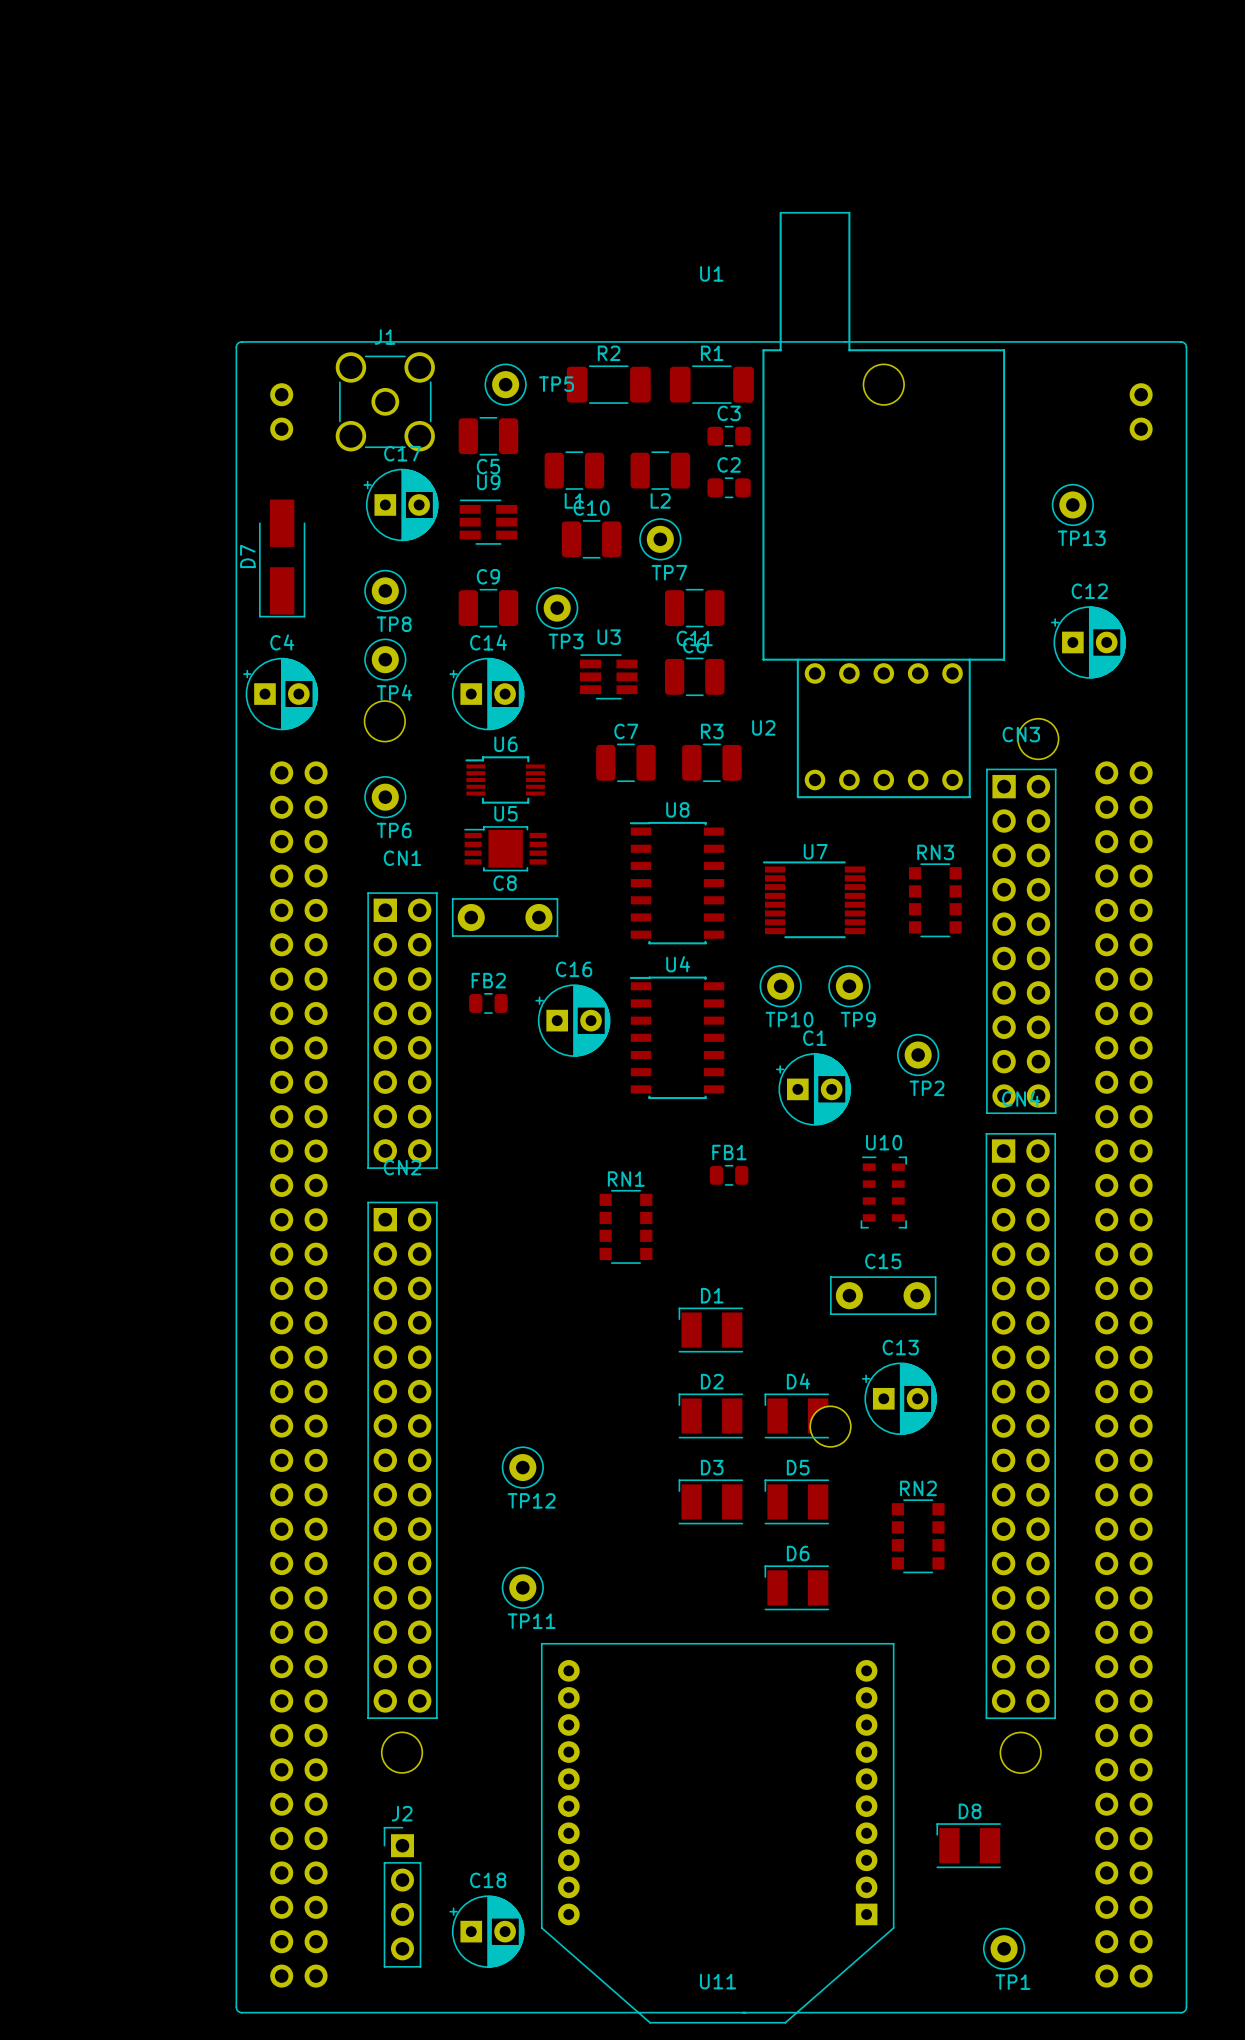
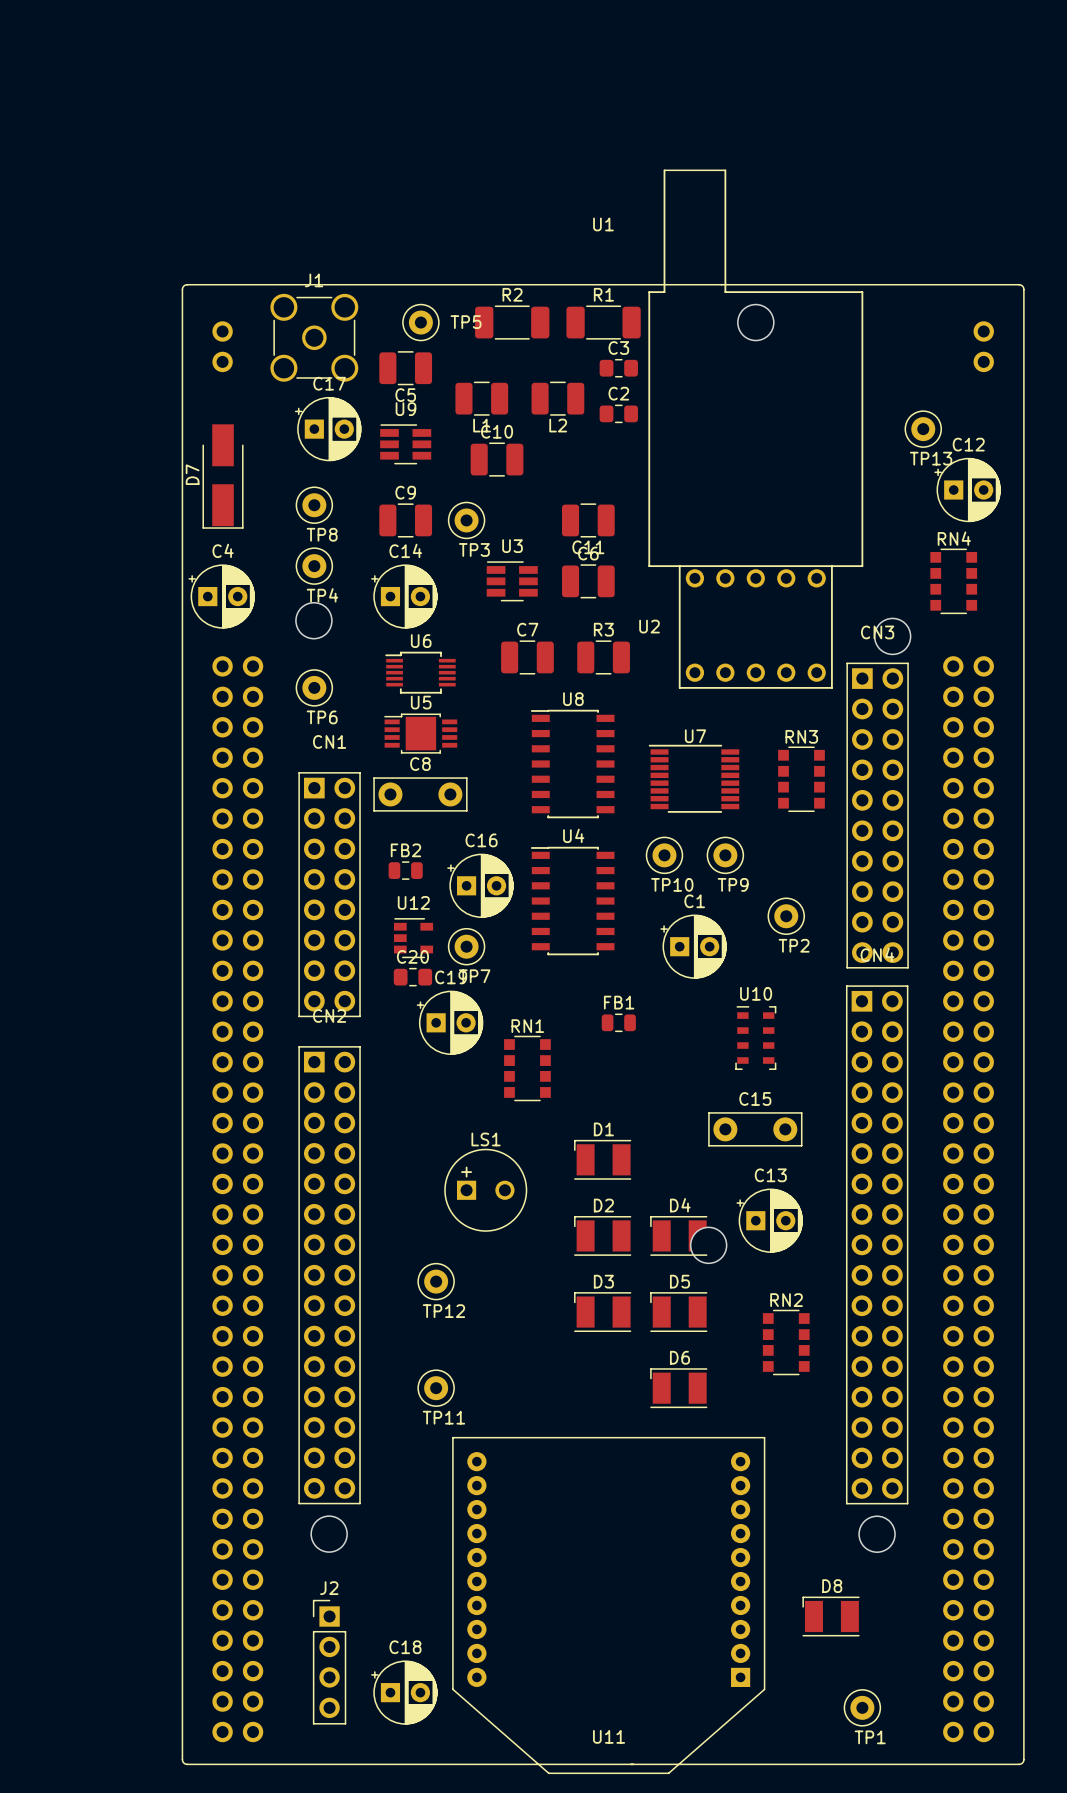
TP7 position: (660, 539) -> (466, 946)
C12 position: (1088, 642) -> (967, 490)
RN4: none -> (953, 581)
U12: none -> (413, 938)
C20: none -> (412, 977)
C19: none -> (450, 1022)
LS1: none -> (485, 1190)

